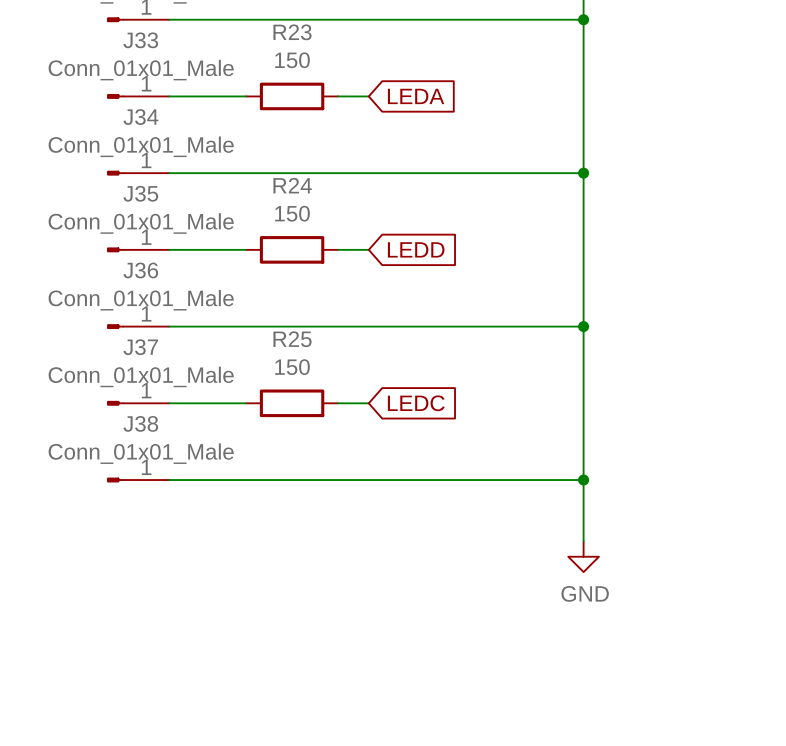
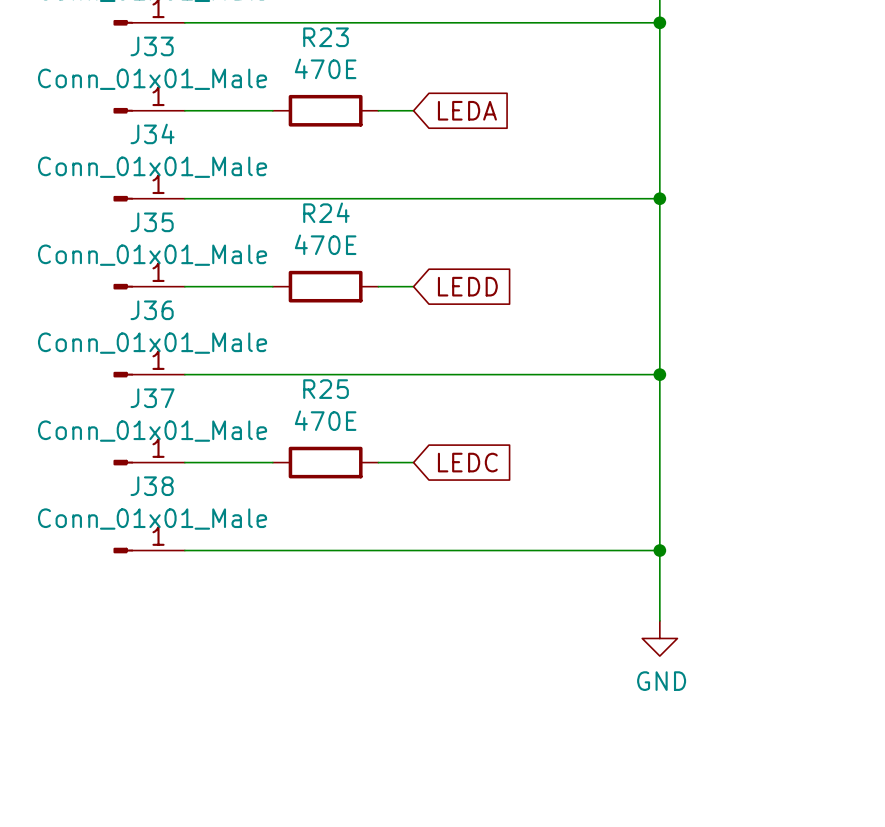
R23 value: 150 (292, 60) -> 470E (325, 68)
R24 value: 150 (292, 213) -> 470E (325, 244)
R25 value: 150 (292, 367) -> 470E (325, 420)

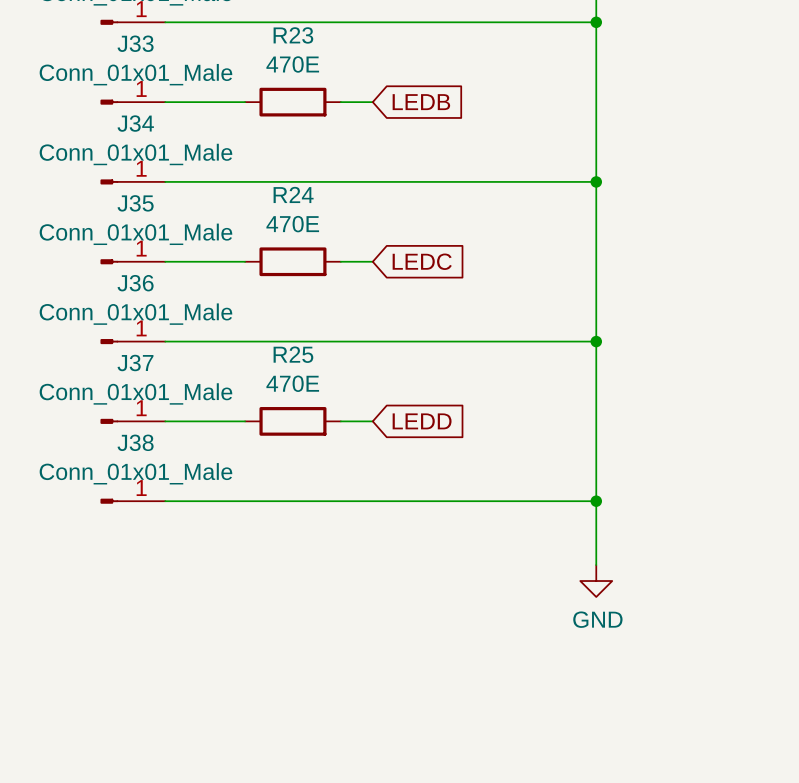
global label: LEDA (467, 110) -> LEDB (421, 102)
global label: LEDD (467, 286) -> LEDC (422, 261)
global label: LEDC (467, 462) -> LEDD (422, 421)

